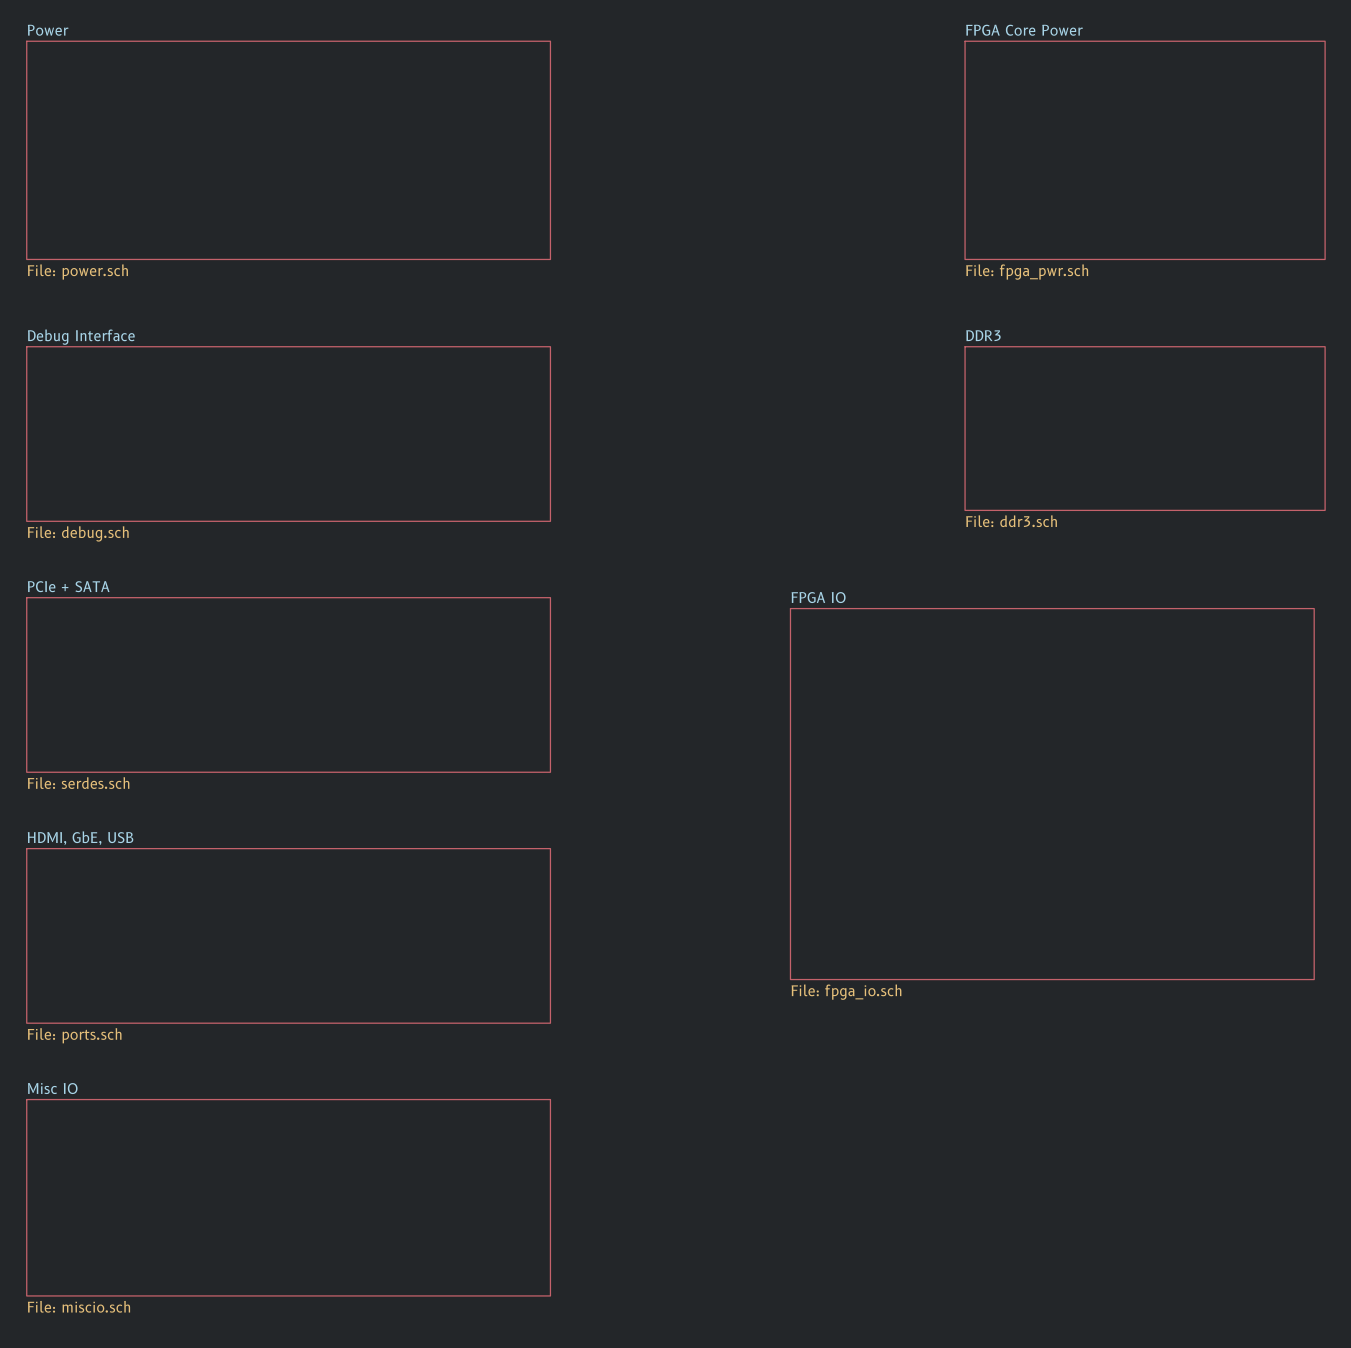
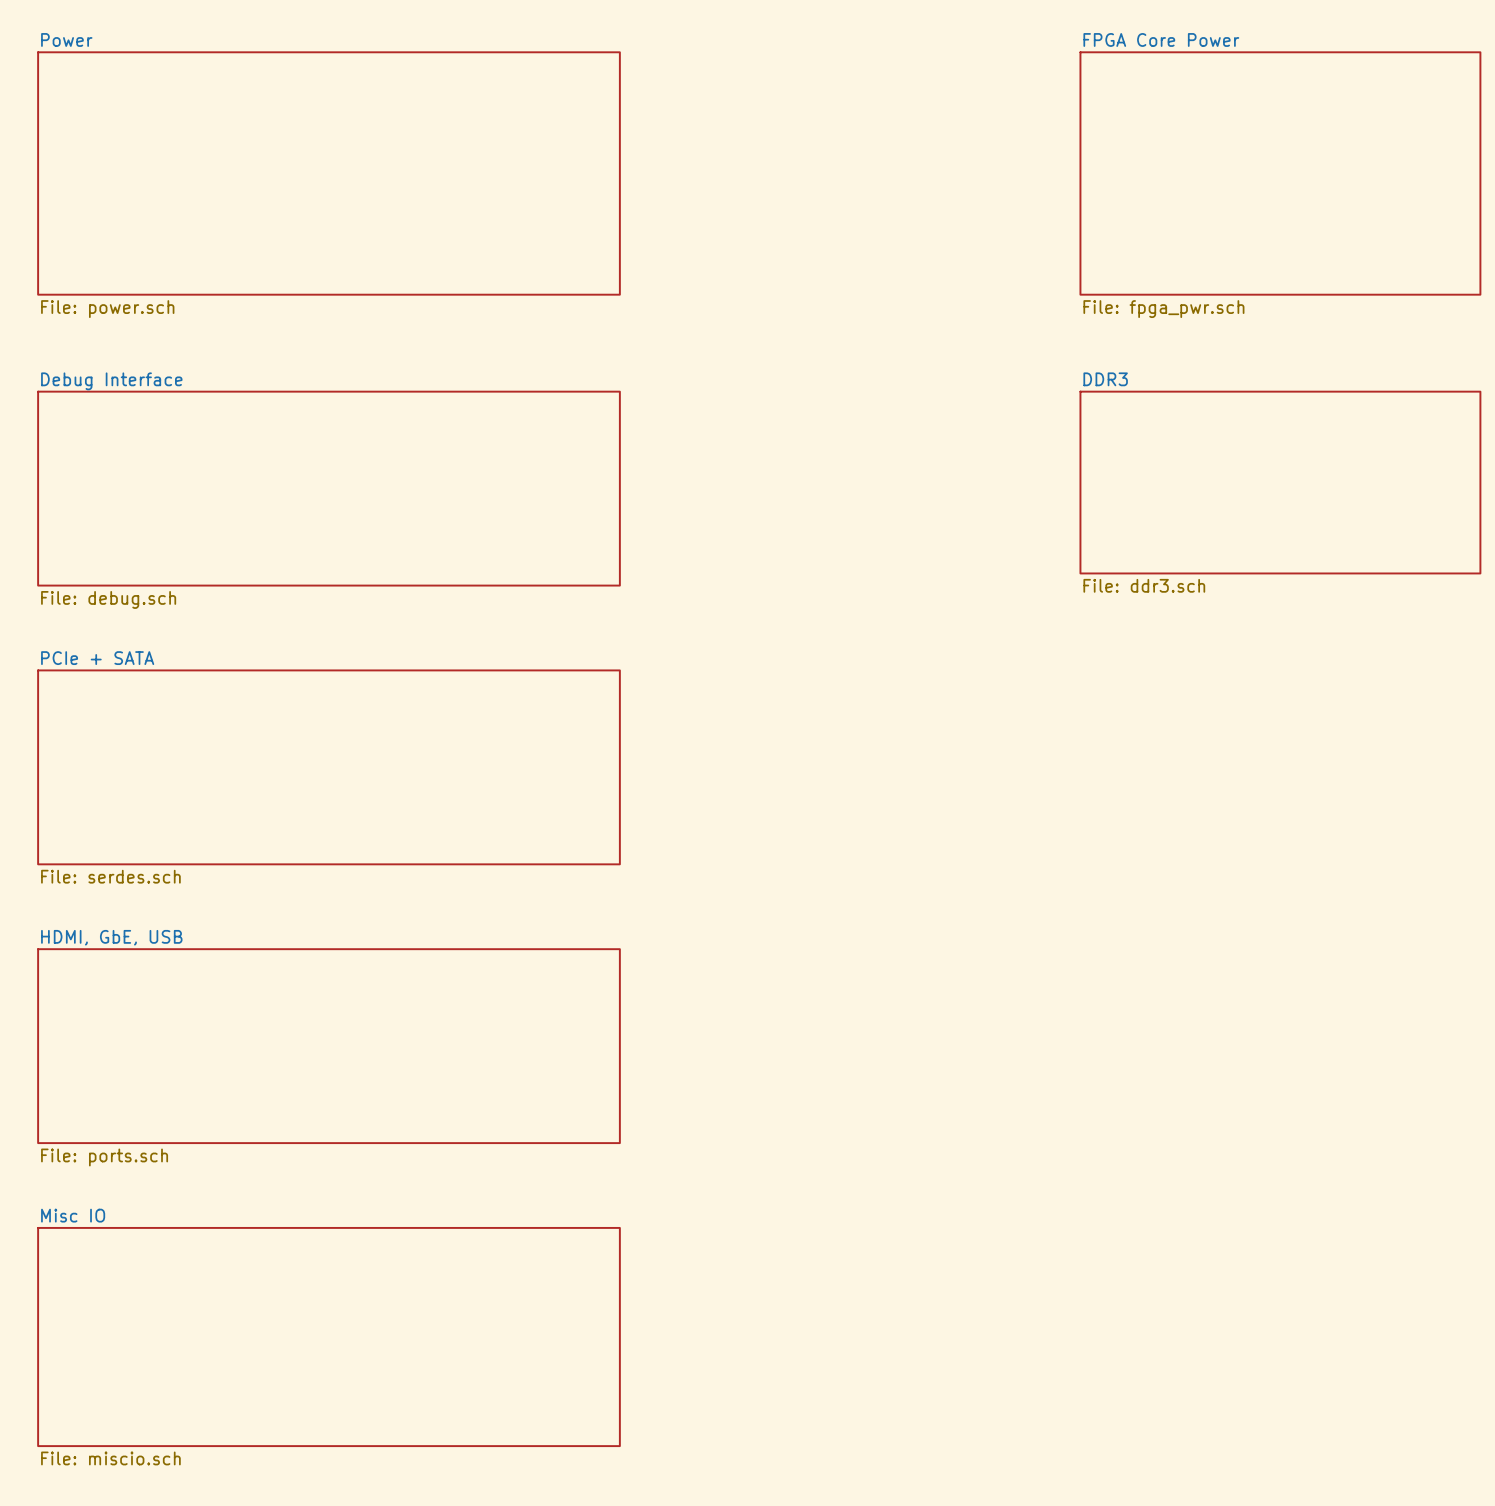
sheet FPGA IO: File: fpga_io.sch (1052, 794) -> none

